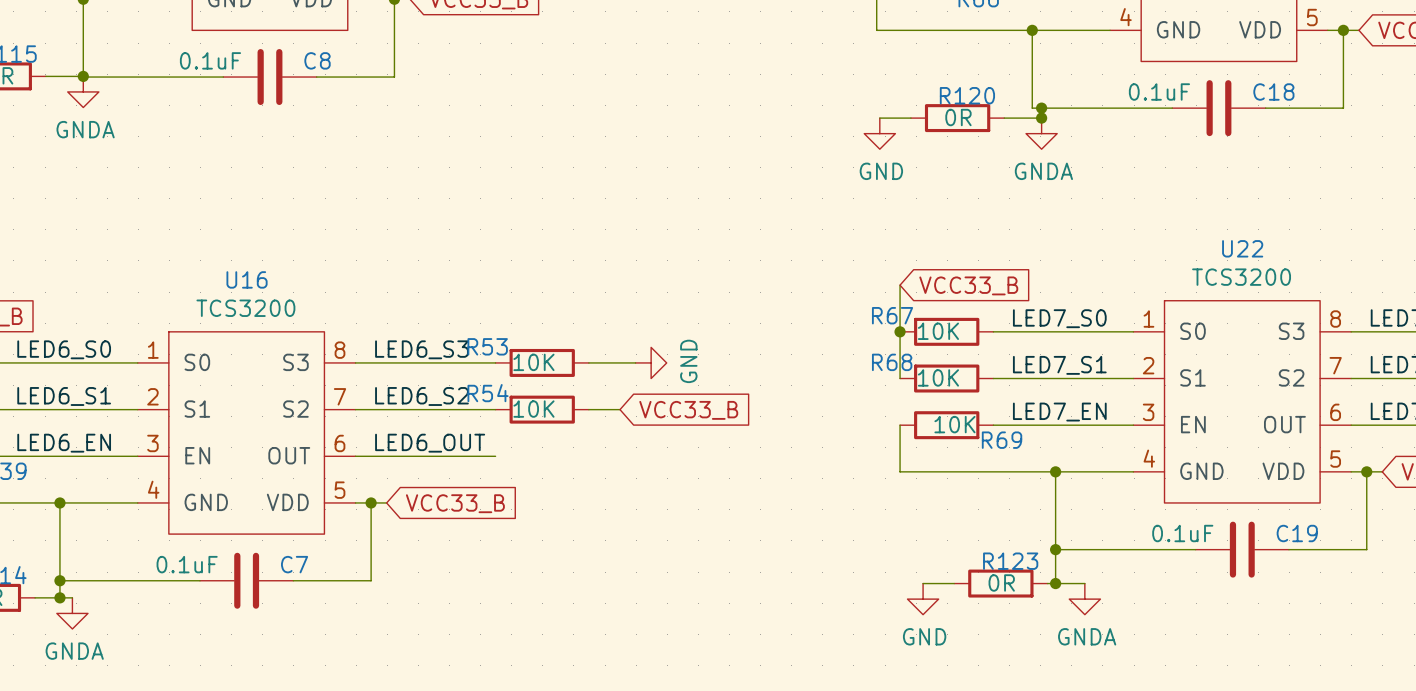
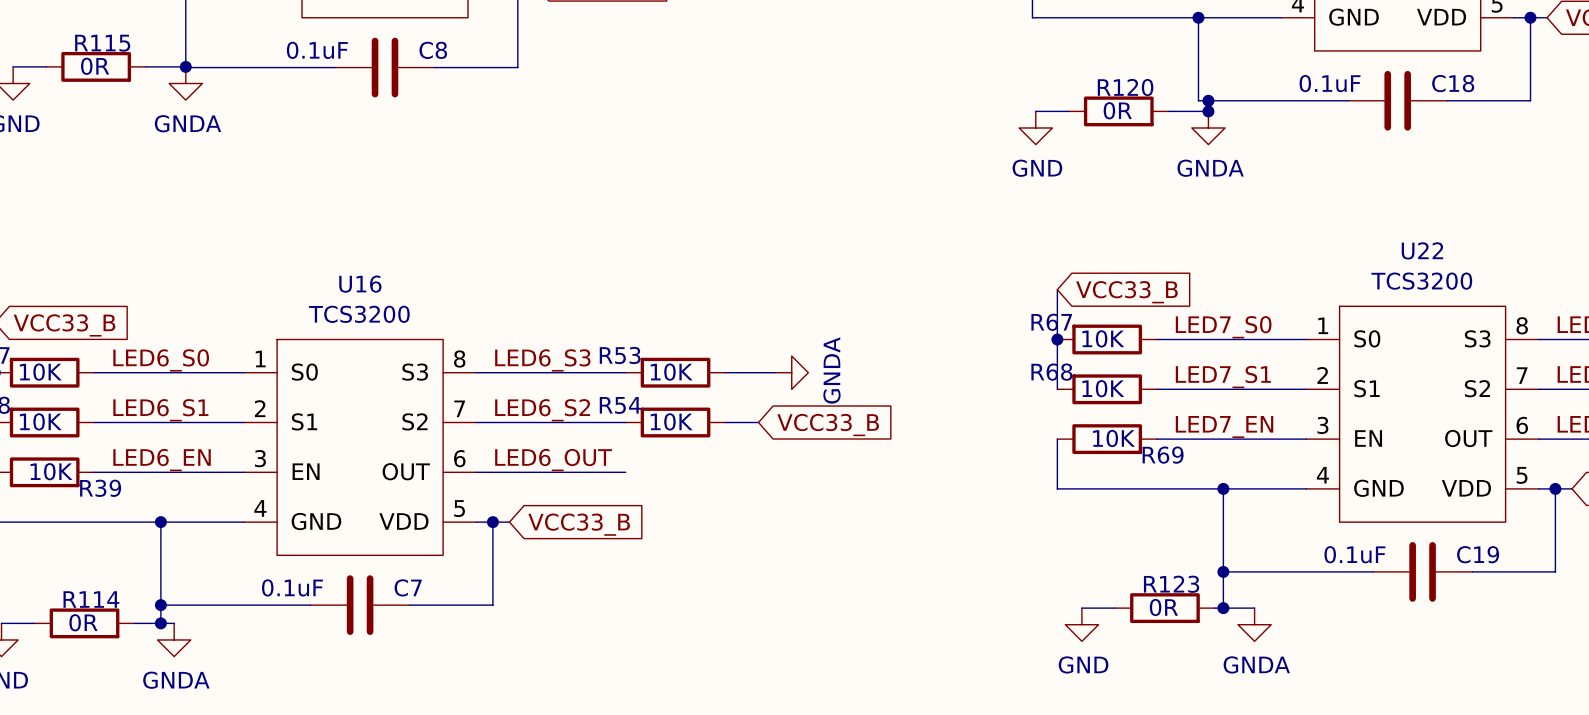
power symbol: GND (651, 362) -> GNDA (791, 372)

